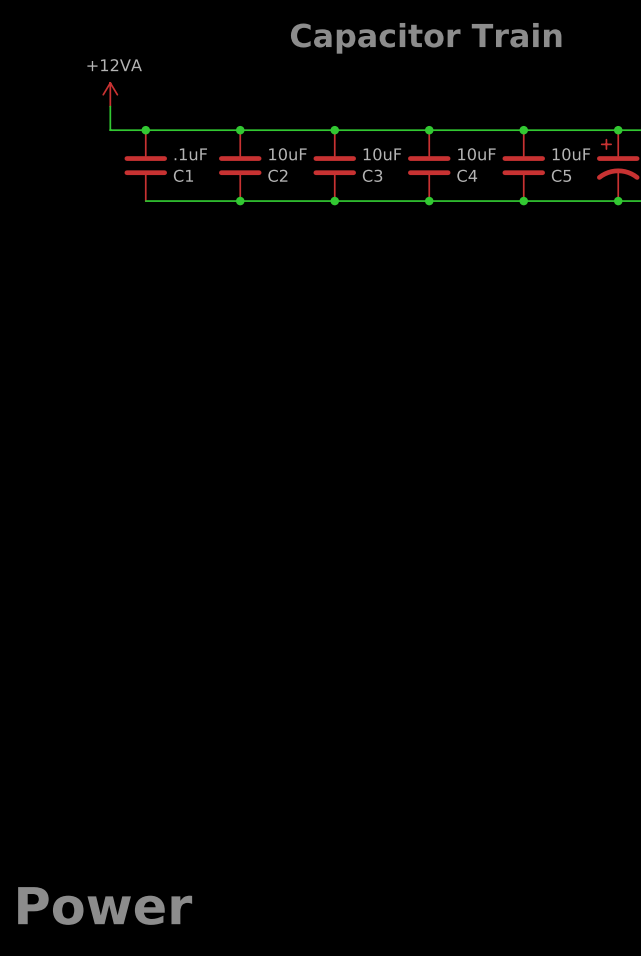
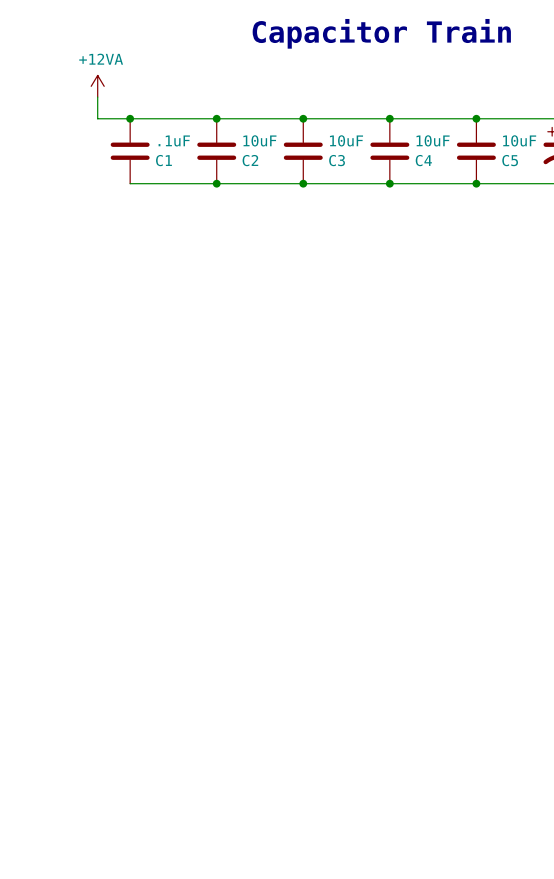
text: Power (105, 906) -> none

